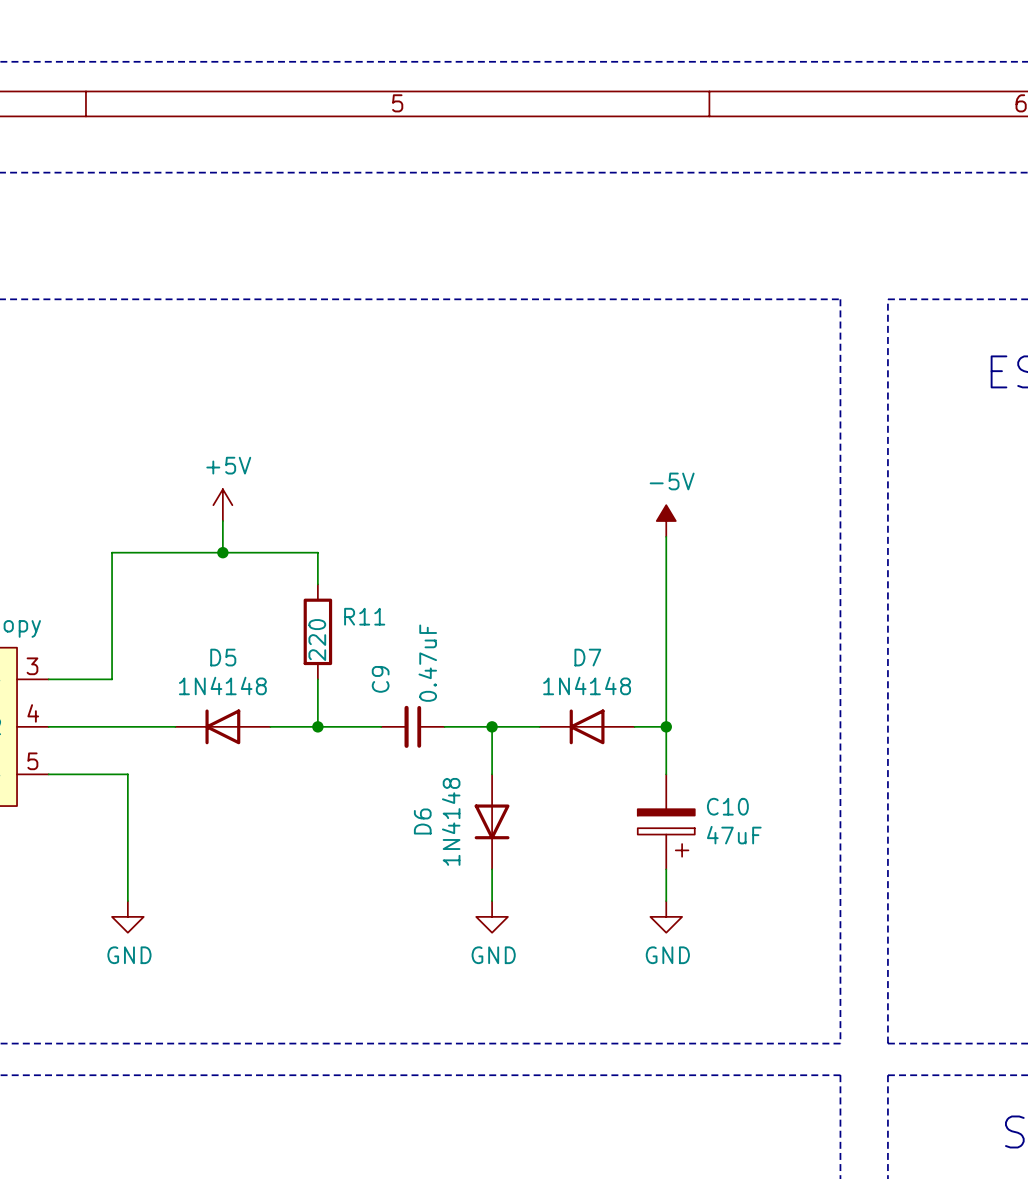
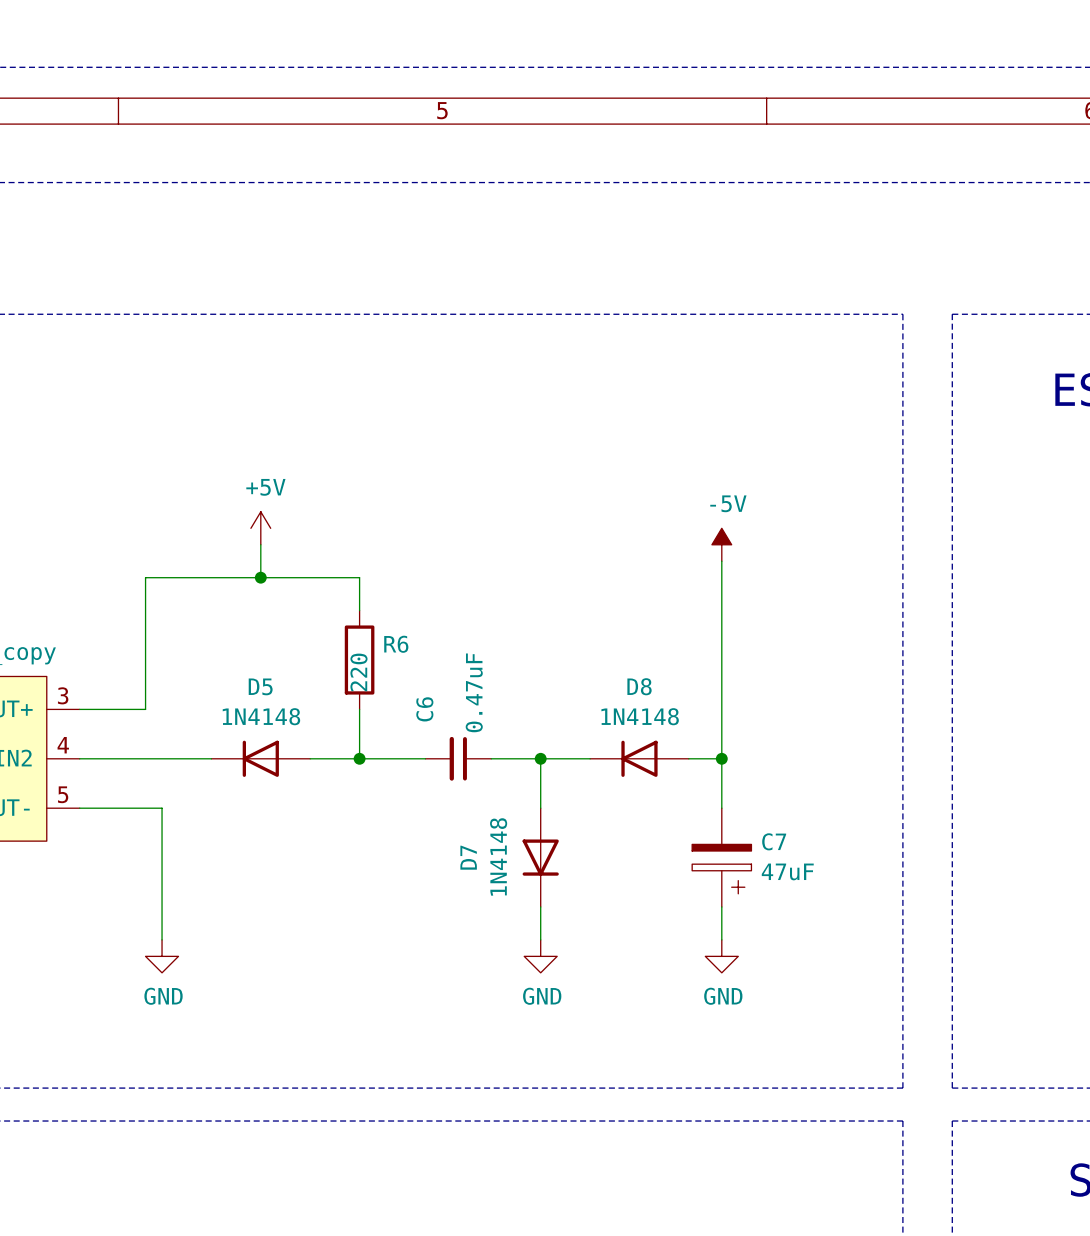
R11 name: R11 (364, 616) -> R6 (396, 644)
D7 name: D7 (587, 657) -> D8 (639, 686)
C9 name: C9 (380, 679) -> C6 (424, 709)
C10 name: C10 (727, 806) -> C7 (774, 841)
D6 name: D6 (422, 821) -> D7 (468, 857)

